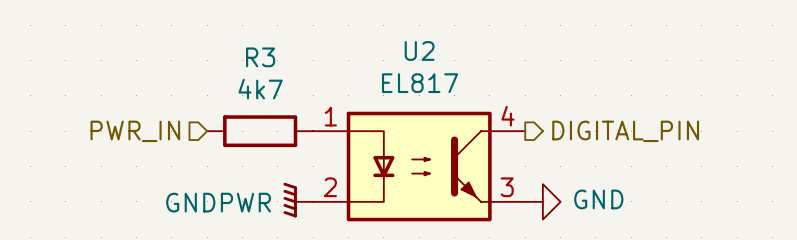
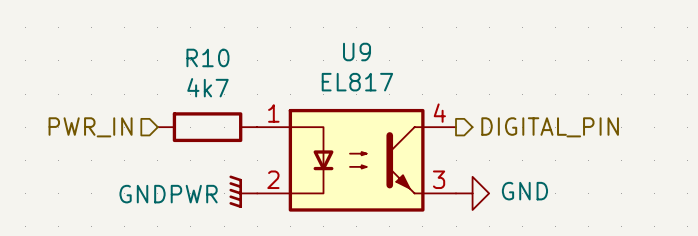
U2 name: U2 (419, 51) -> U9 (357, 52)
R3 name: R3 (260, 57) -> R10 (207, 57)

